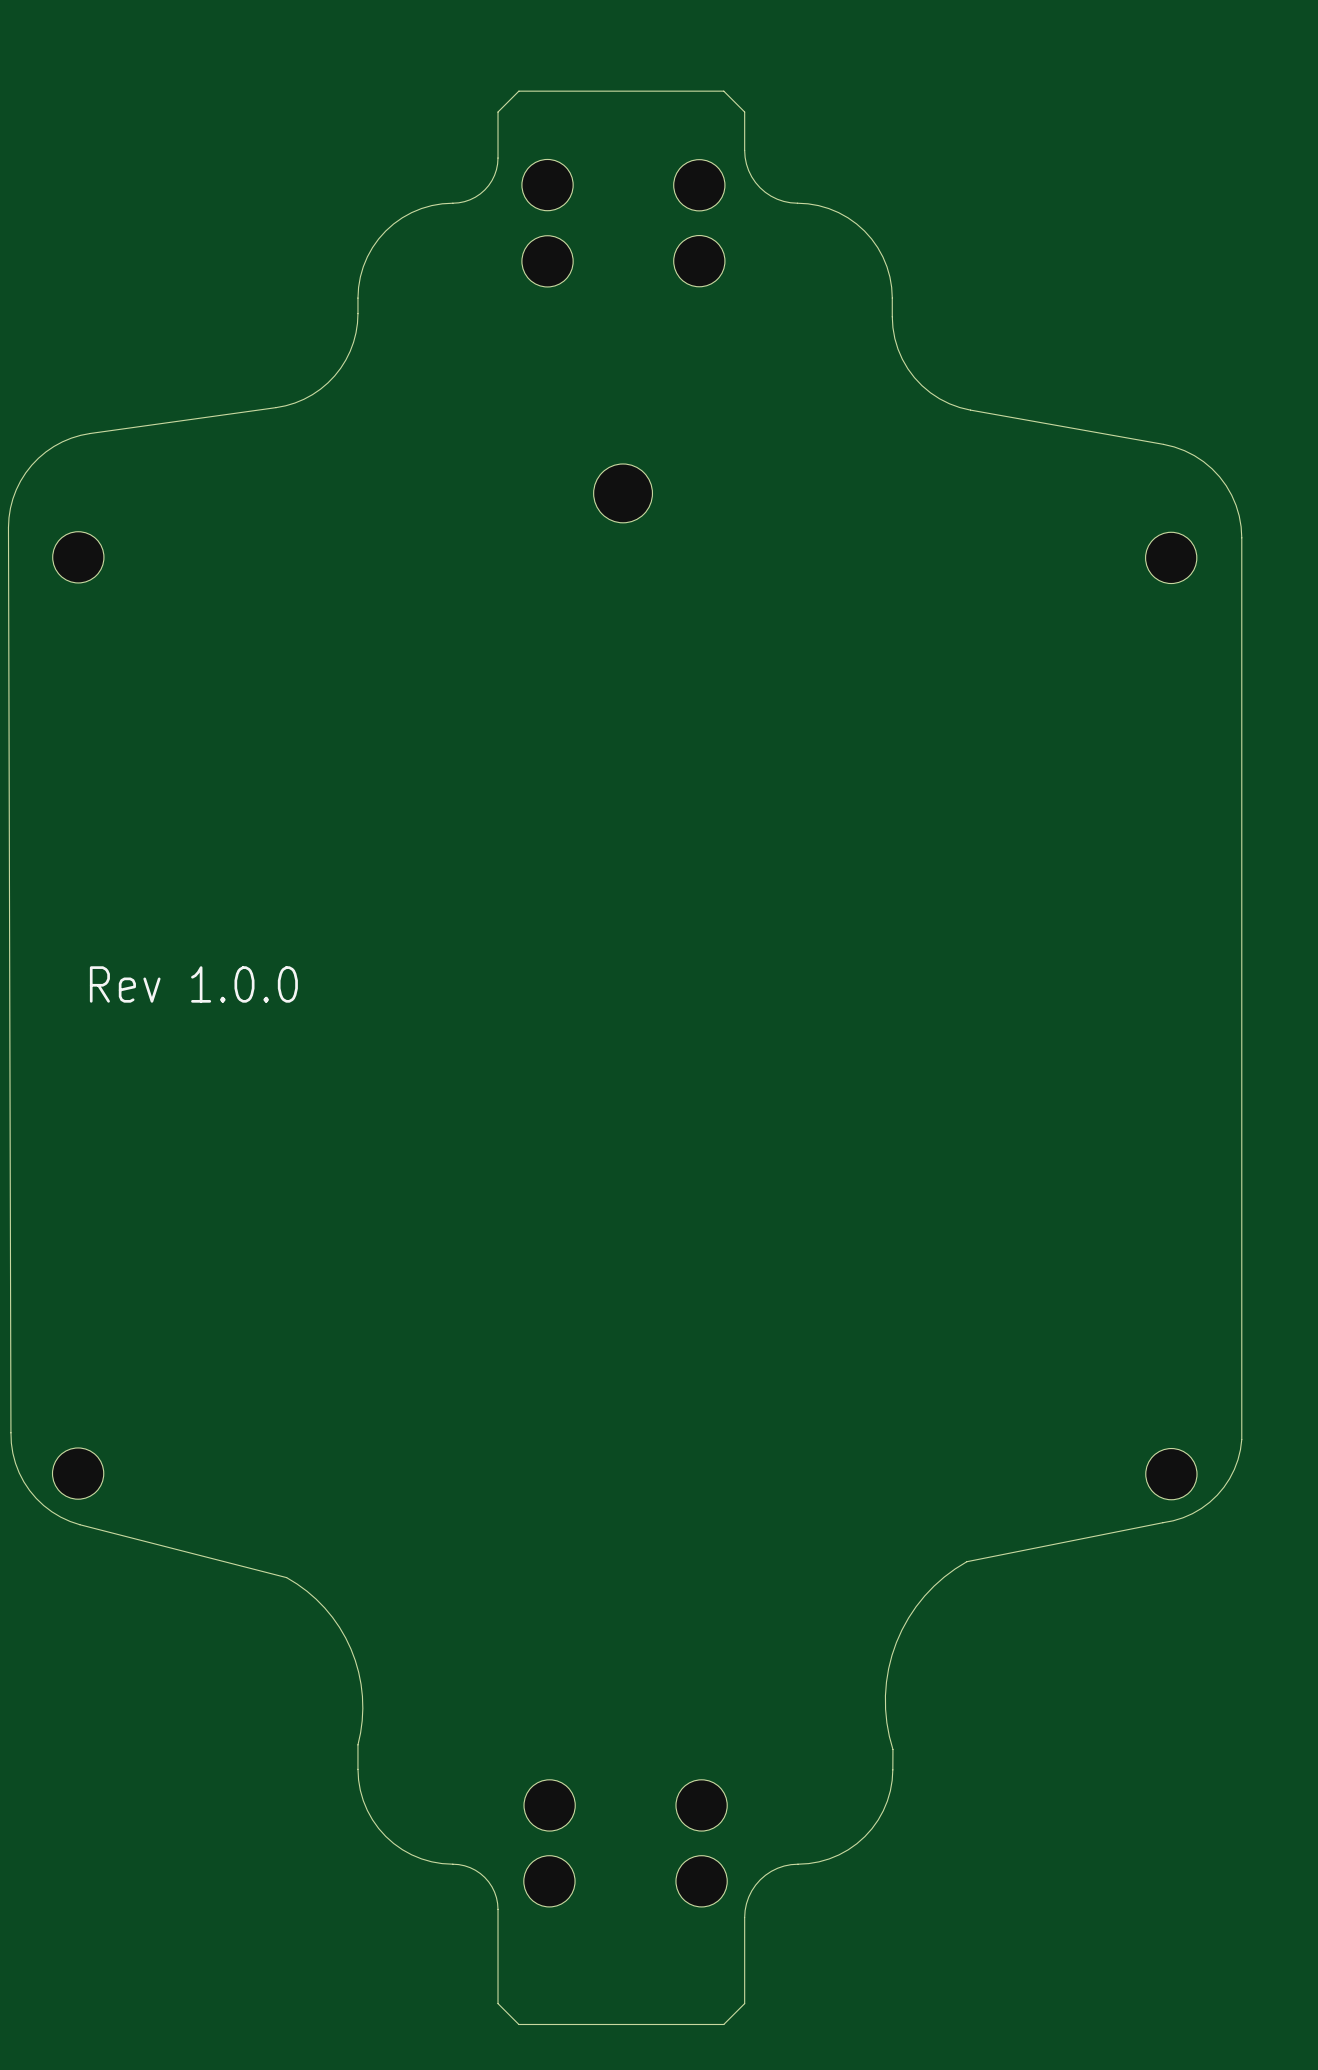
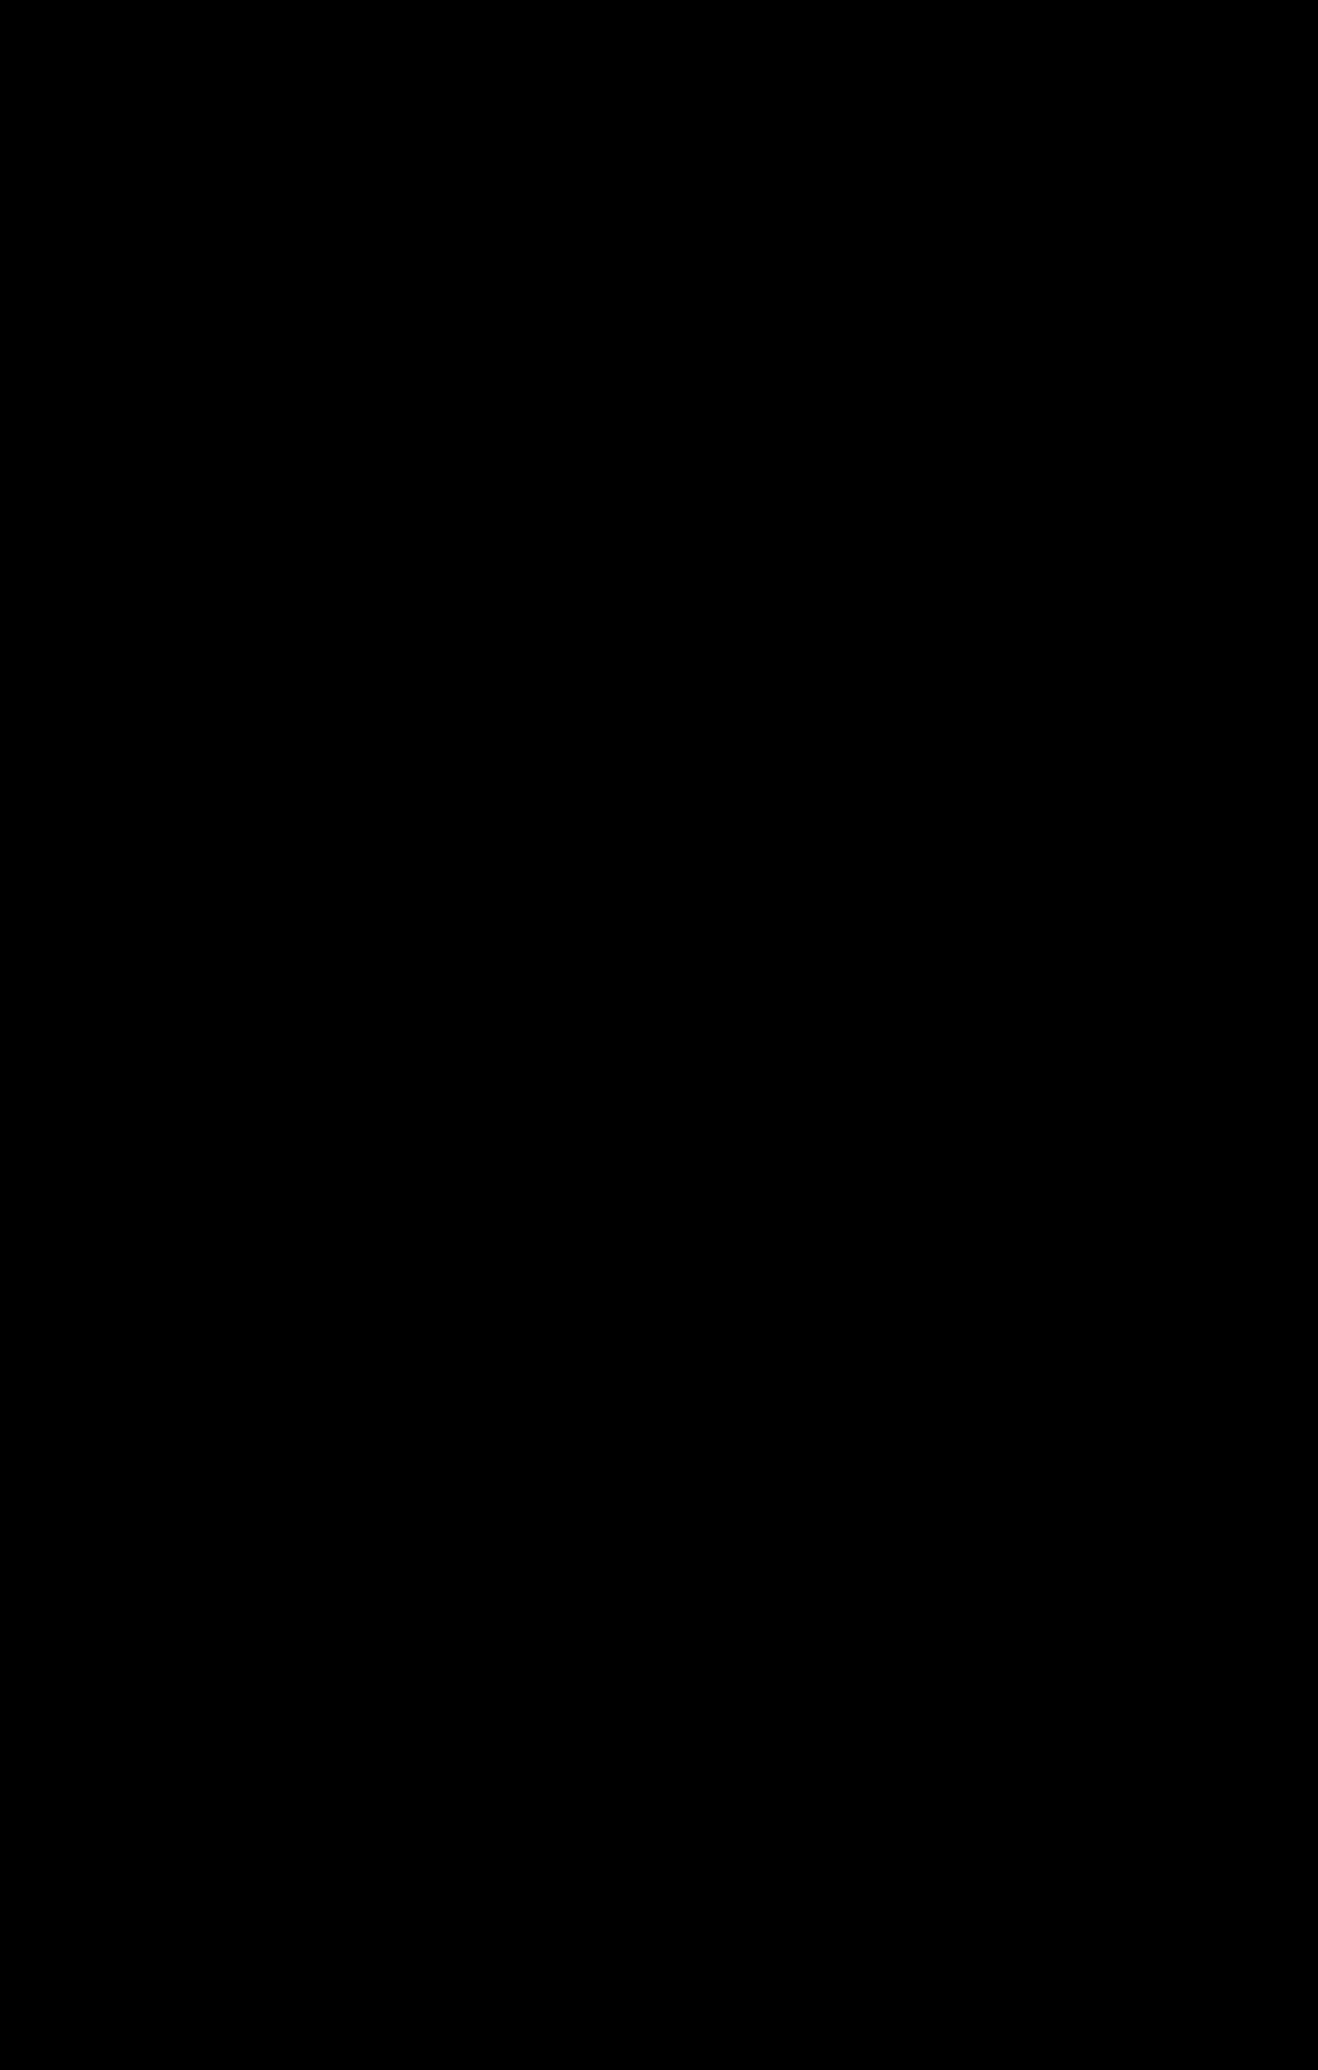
board edge: (518, 91) (723, 91) (744, 112) (746, 164) (751, 176) (760, 187) (771, 196) (783, 201) (818, 205) (838, 212) (856, 223) (877, 247) (889, 276) (892, 327) (898, 349) (907, 368) (922, 385) (939, 398) (959, 407) (1163, 444) (1184, 450) (1203, 461) (1219, 476) (1236, 505) (1241, 526) (1241, 1439) (1237, 1459) (1229, 1478) (1217, 1495) (1201, 1508) (1183, 1517) (966, 1561) (944, 1577) (924, 1596) (901, 1629) (888, 1668) (885, 1709) (892, 1749) (892, 1769) (890, 1790) (883, 1810) (871, 1828) (848, 1849) (819, 1861) (791, 1864) (777, 1868) (765, 1875) (755, 1885) (748, 1897) (745, 1910) (744, 2003) (723, 2024) (518, 2024) (498, 2003) (497, 1903) (494, 1892) (488, 1881) (480, 1873) (470, 1867) (431, 1861) (402, 1849) (385, 1836) (367, 1810) (358, 1779) (357, 1744) (362, 1708) (358, 1672) (345, 1637) (324, 1607) (306, 1591) (286, 1577) (79, 1524) (60, 1517) (36, 1498) (23, 1481) (15, 1463) (11, 1443) (8, 527) (10, 508) (16, 489) (25, 472) (38, 458) (53, 446) (71, 438) (90, 433) (285, 405) (303, 399) (320, 389) (340, 368) (353, 342) (357, 323) (360, 276) (372, 247) (393, 223) (411, 212) (431, 205) (464, 201) (475, 197) (484, 189) (494, 175) (497, 163) (498, 112) (518, 91) -> none
hole: (547, 185) -> none
hole: (699, 185) -> none
hole: (547, 261) -> none
hole: (699, 261) -> none
hole: (623, 493) -> none
hole: (78, 557) -> none
hole: (1171, 557) -> none
text: Rev 1.0.0 (193, 984) -> none
hole: (78, 1473) -> none
hole: (1171, 1474) -> none
hole: (549, 1805) -> none
hole: (701, 1805) -> none
hole: (549, 1881) -> none
hole: (701, 1881) -> none

